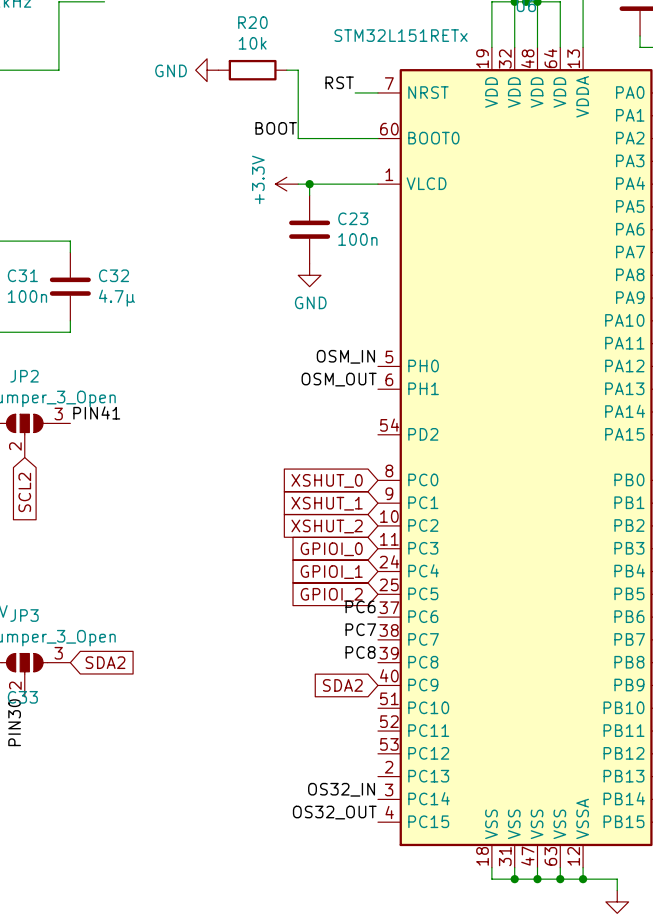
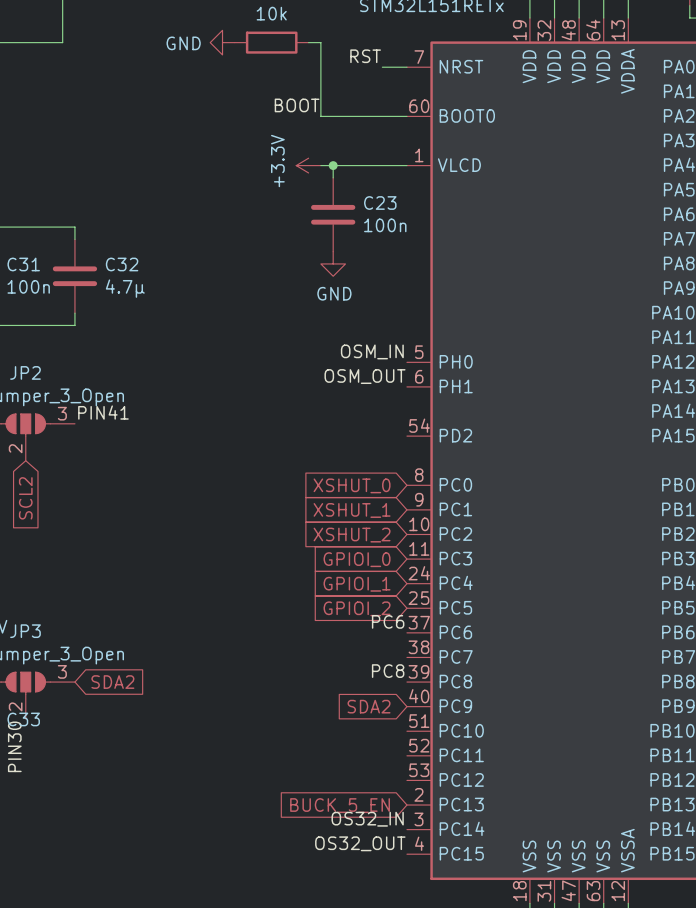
label: PC7 (360, 629) -> none
global label: none -> BUCK_5_EN (340, 805)

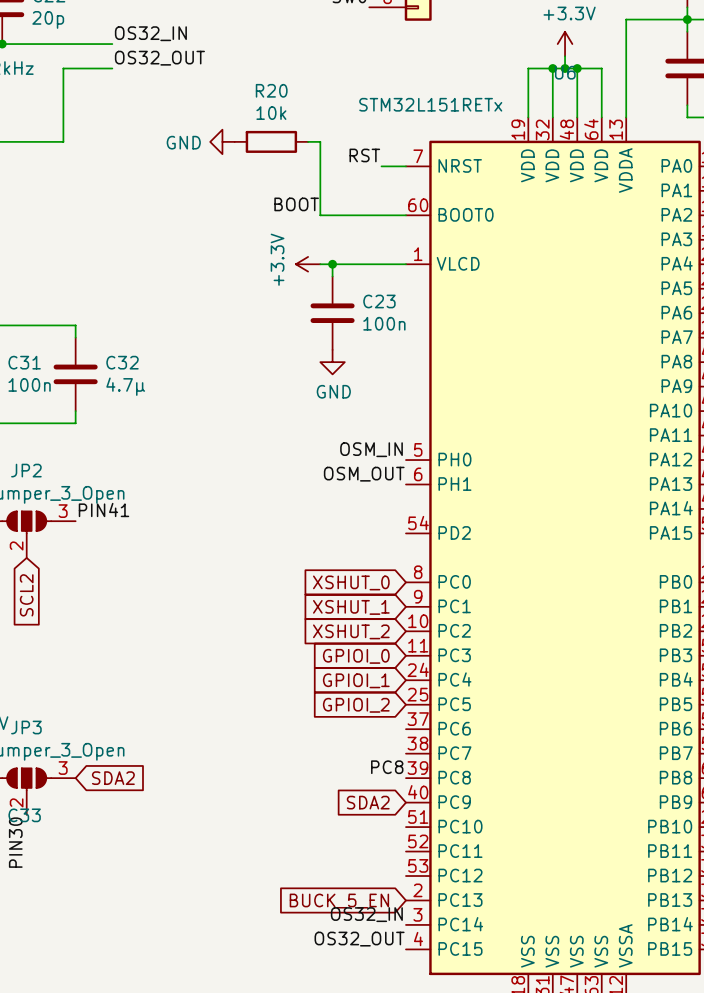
label: PC6 (388, 621) -> none

